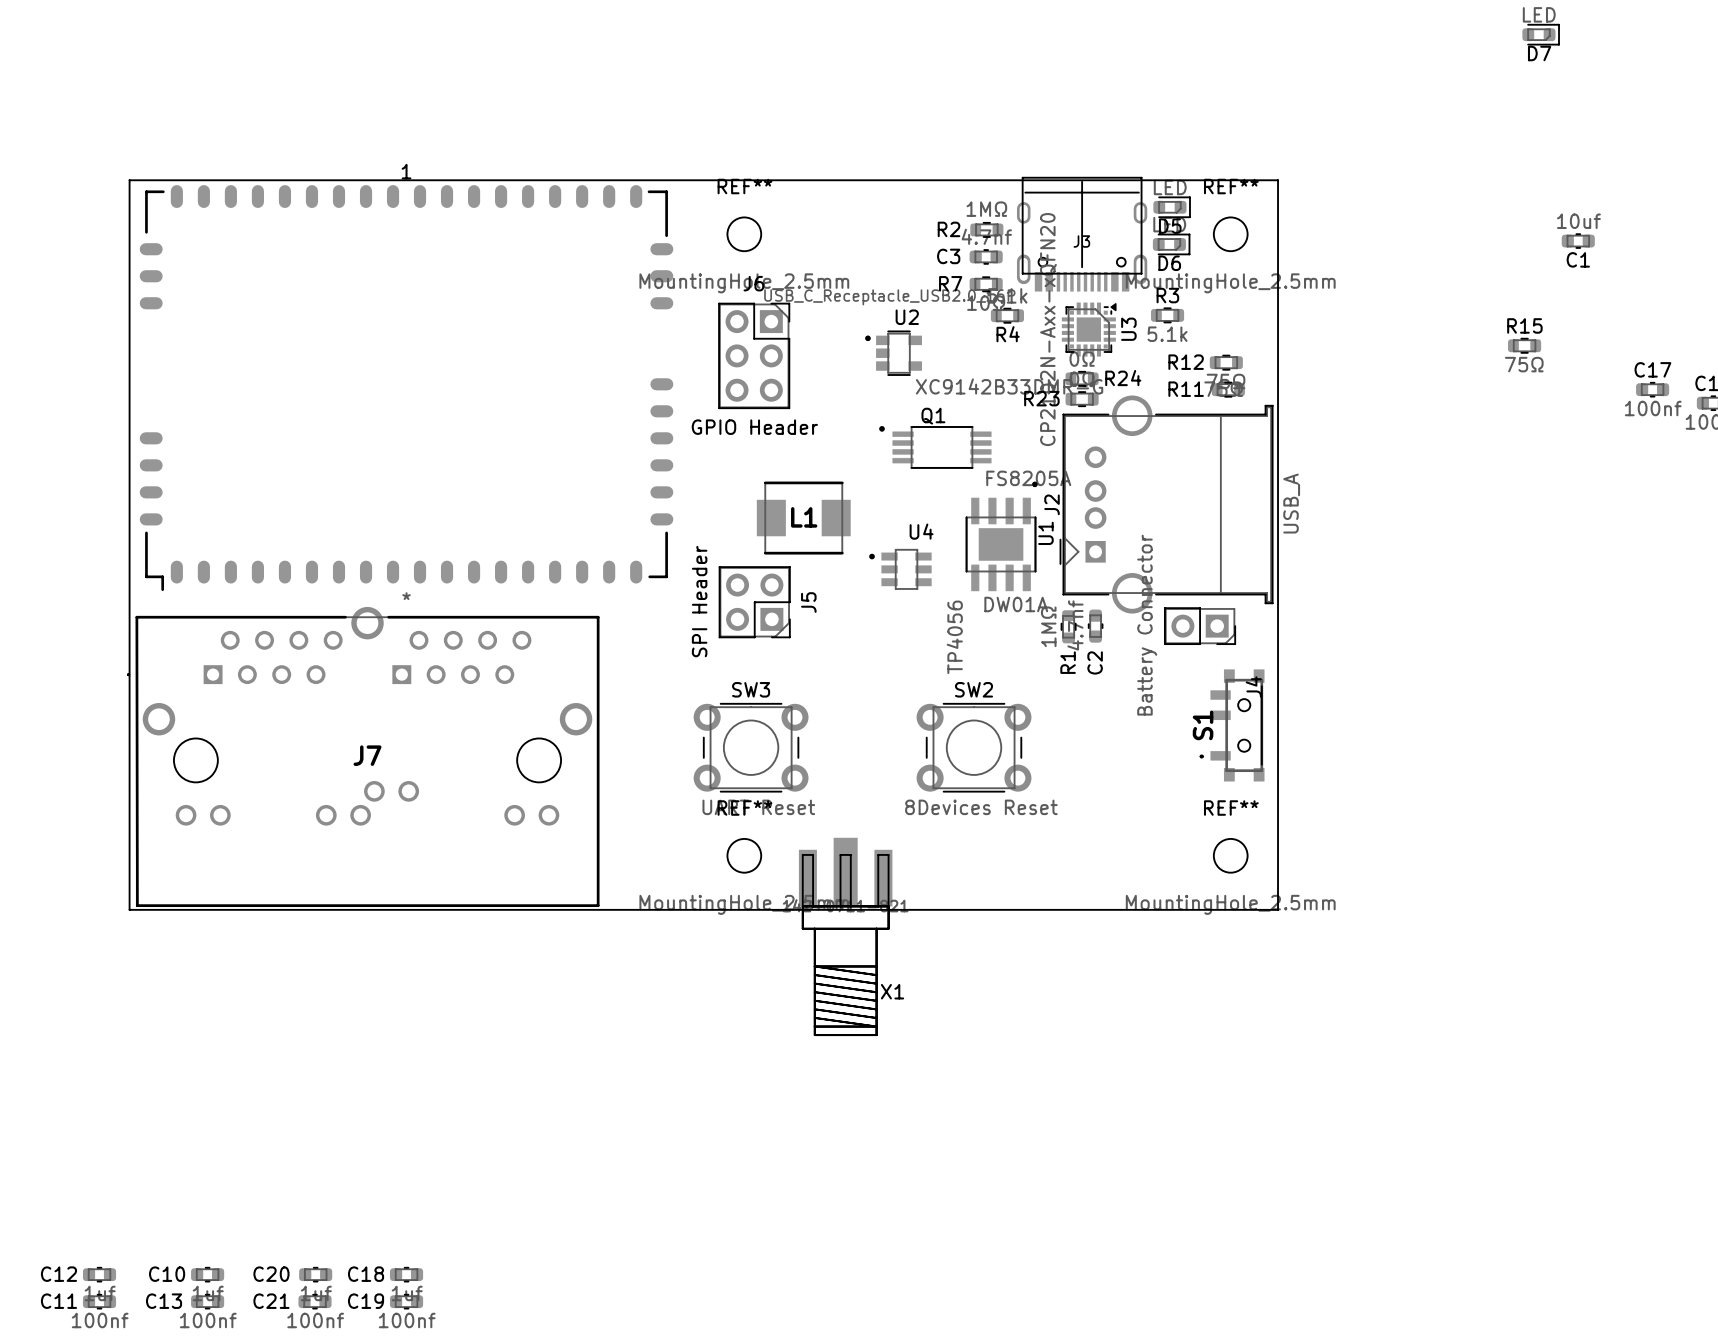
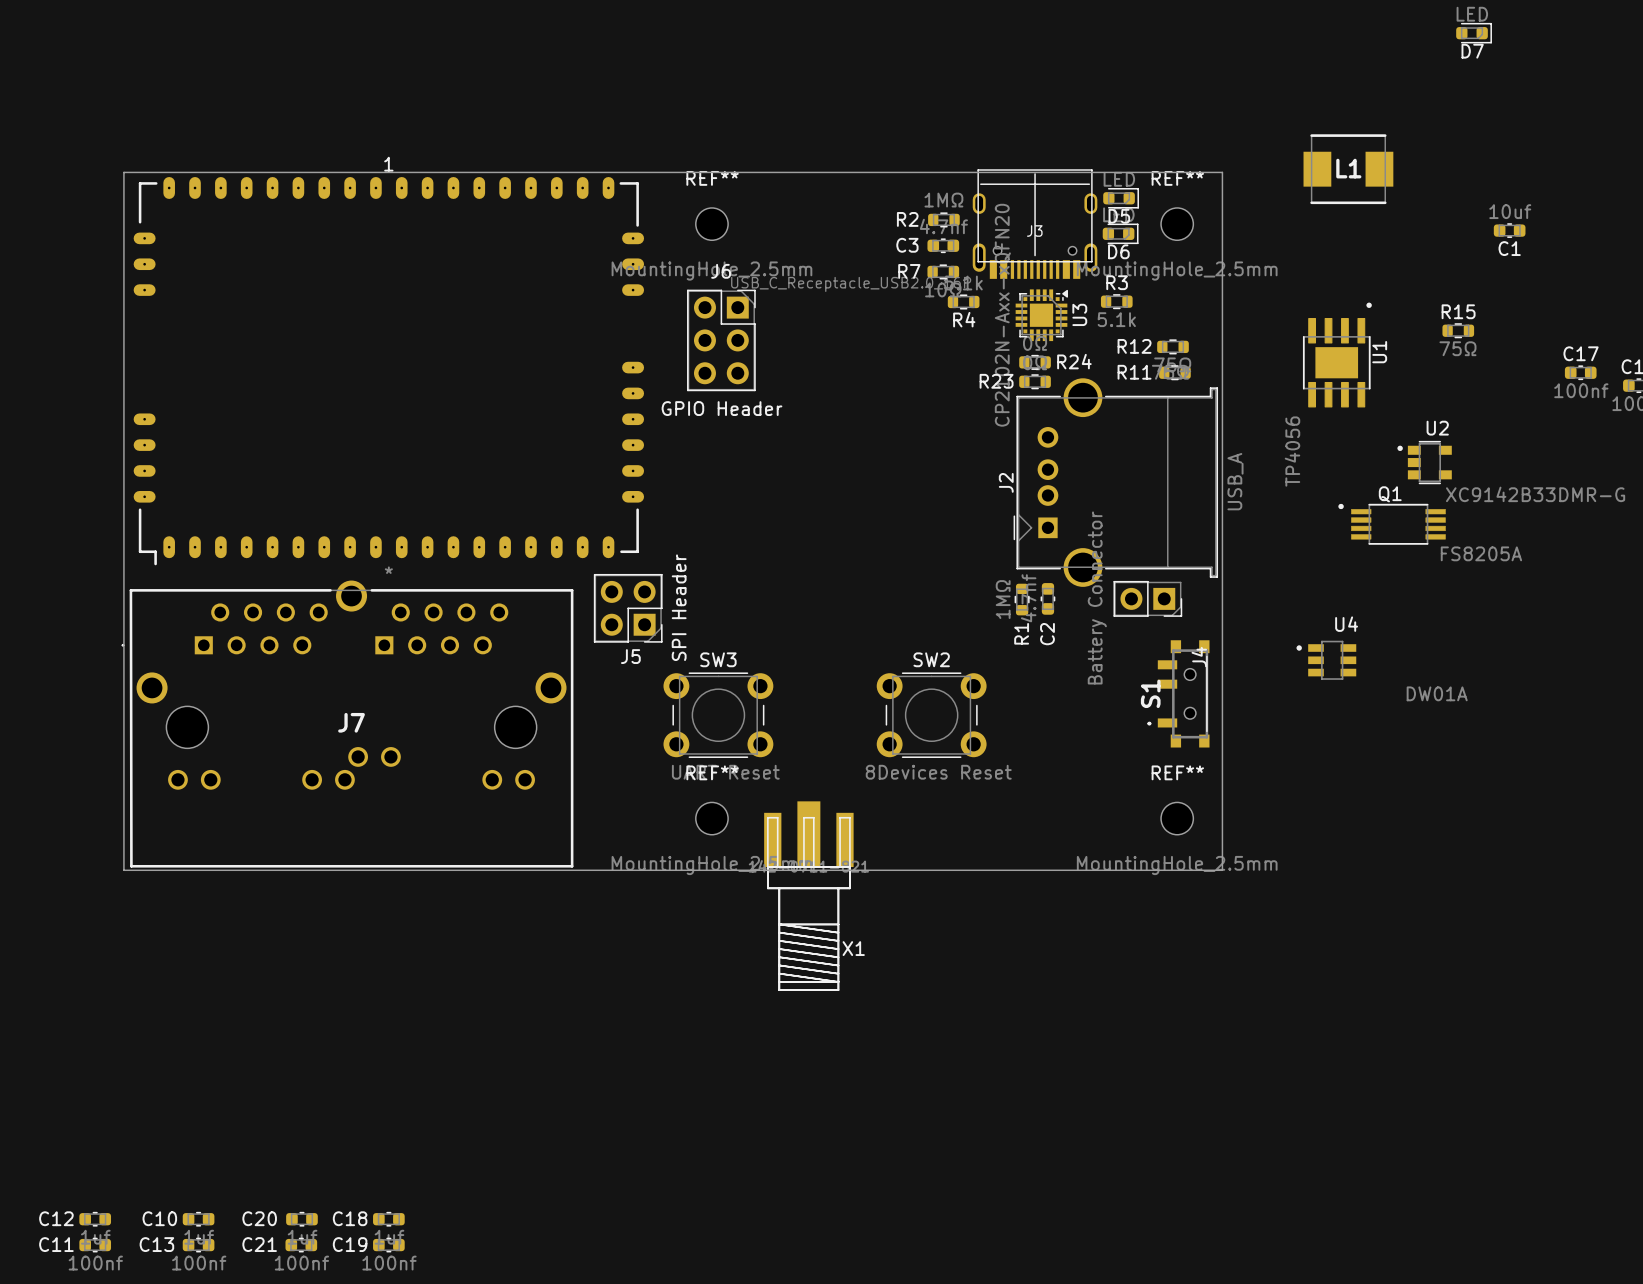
1 footprint: [139, 185, 674, 592] -> [133, 177, 645, 566]
U2 position: (893, 353) -> (1424, 462)
Q1 position: (935, 447) -> (1392, 524)
L1 position: (803, 518) -> (1348, 169)
U1 position: (1001, 536) -> (1337, 355)
U4 position: (900, 569) -> (1326, 660)
J5 value position: SPI Header (699, 601) -> SPI Header (679, 607)
J5 position: (754, 602) -> (628, 608)
J5 name rotation: 0° (808, 602) -> 90° clockwise (630, 656)
J5 name position: J5 (808, 602) -> J5 (630, 656)

